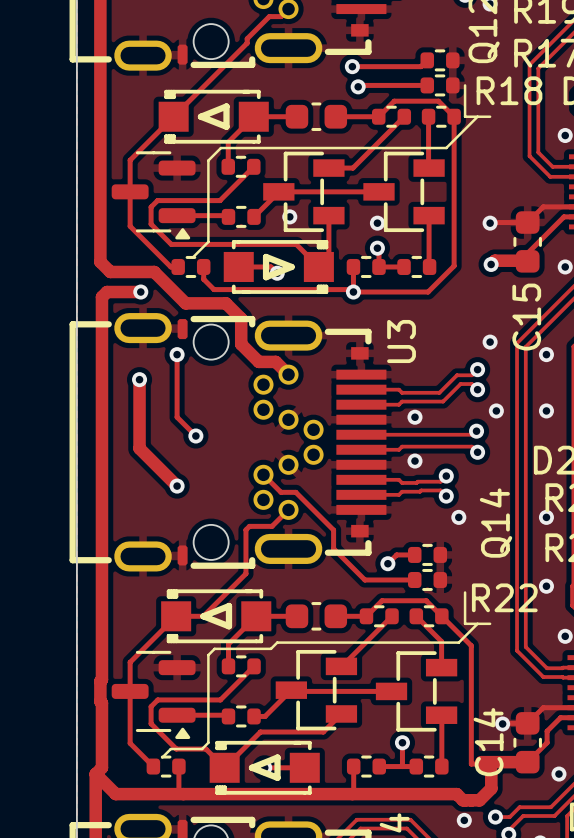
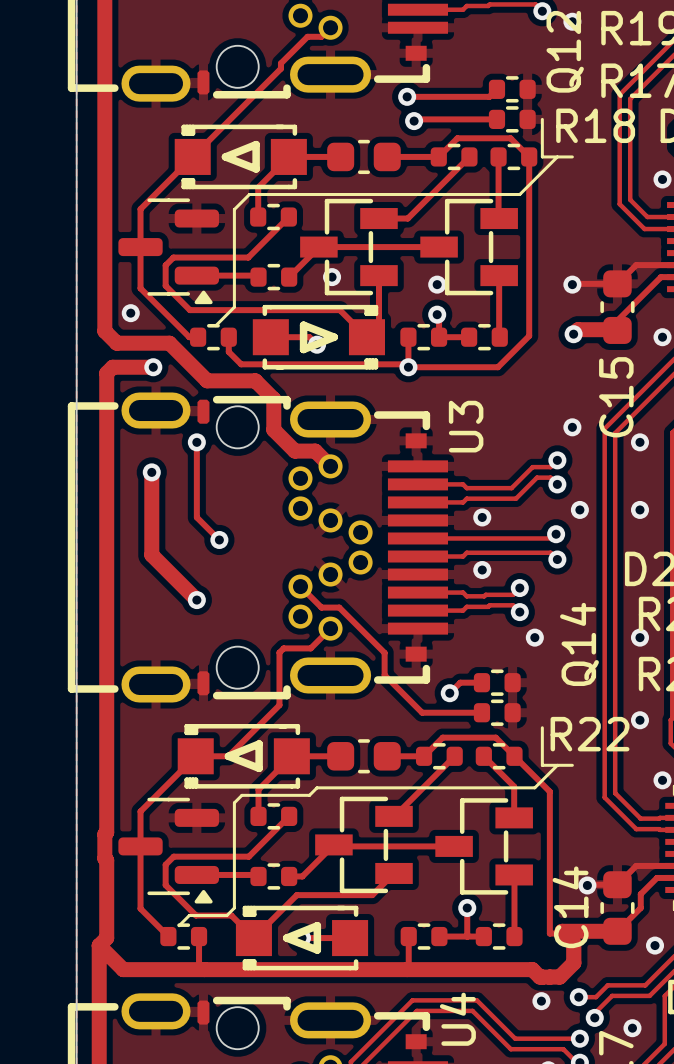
via: none -> (130, 313)

